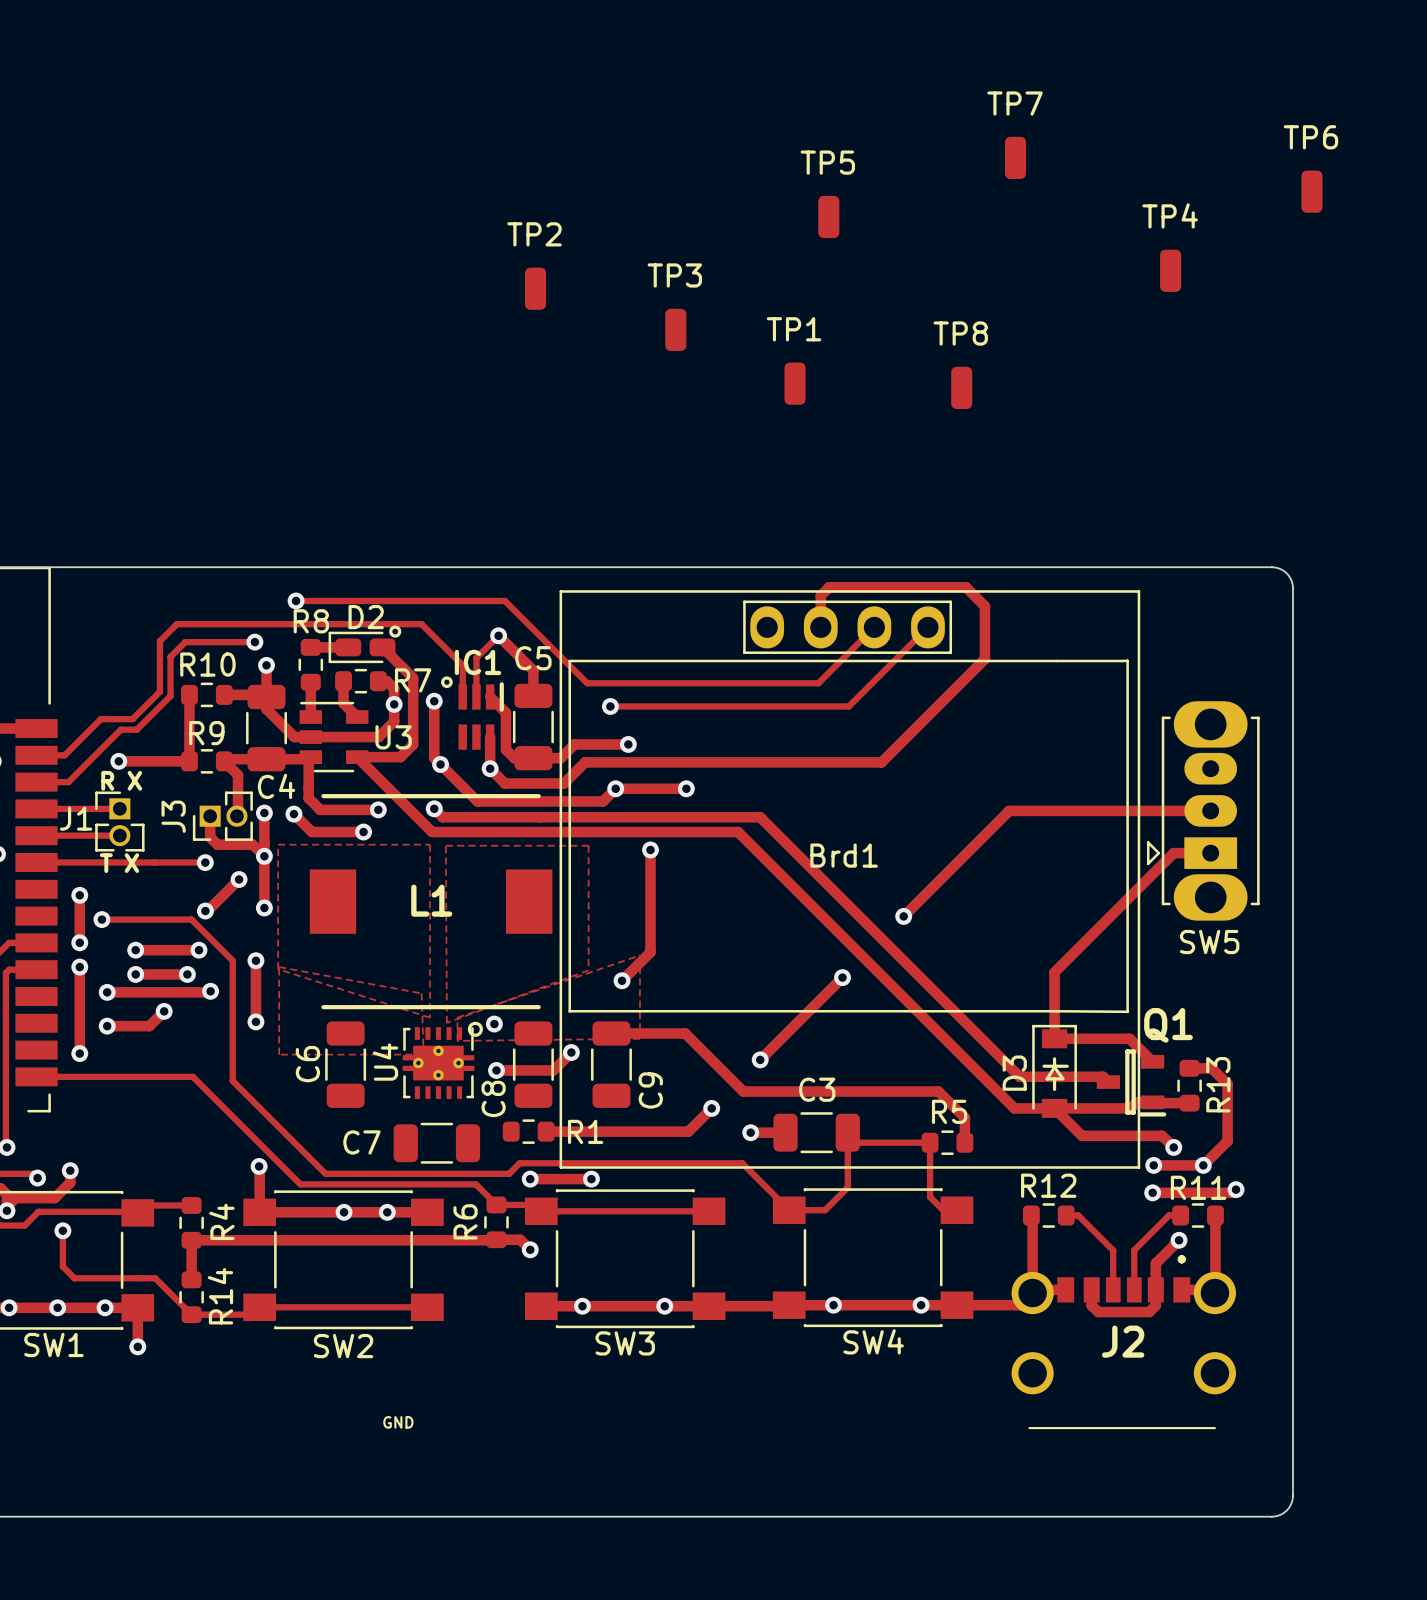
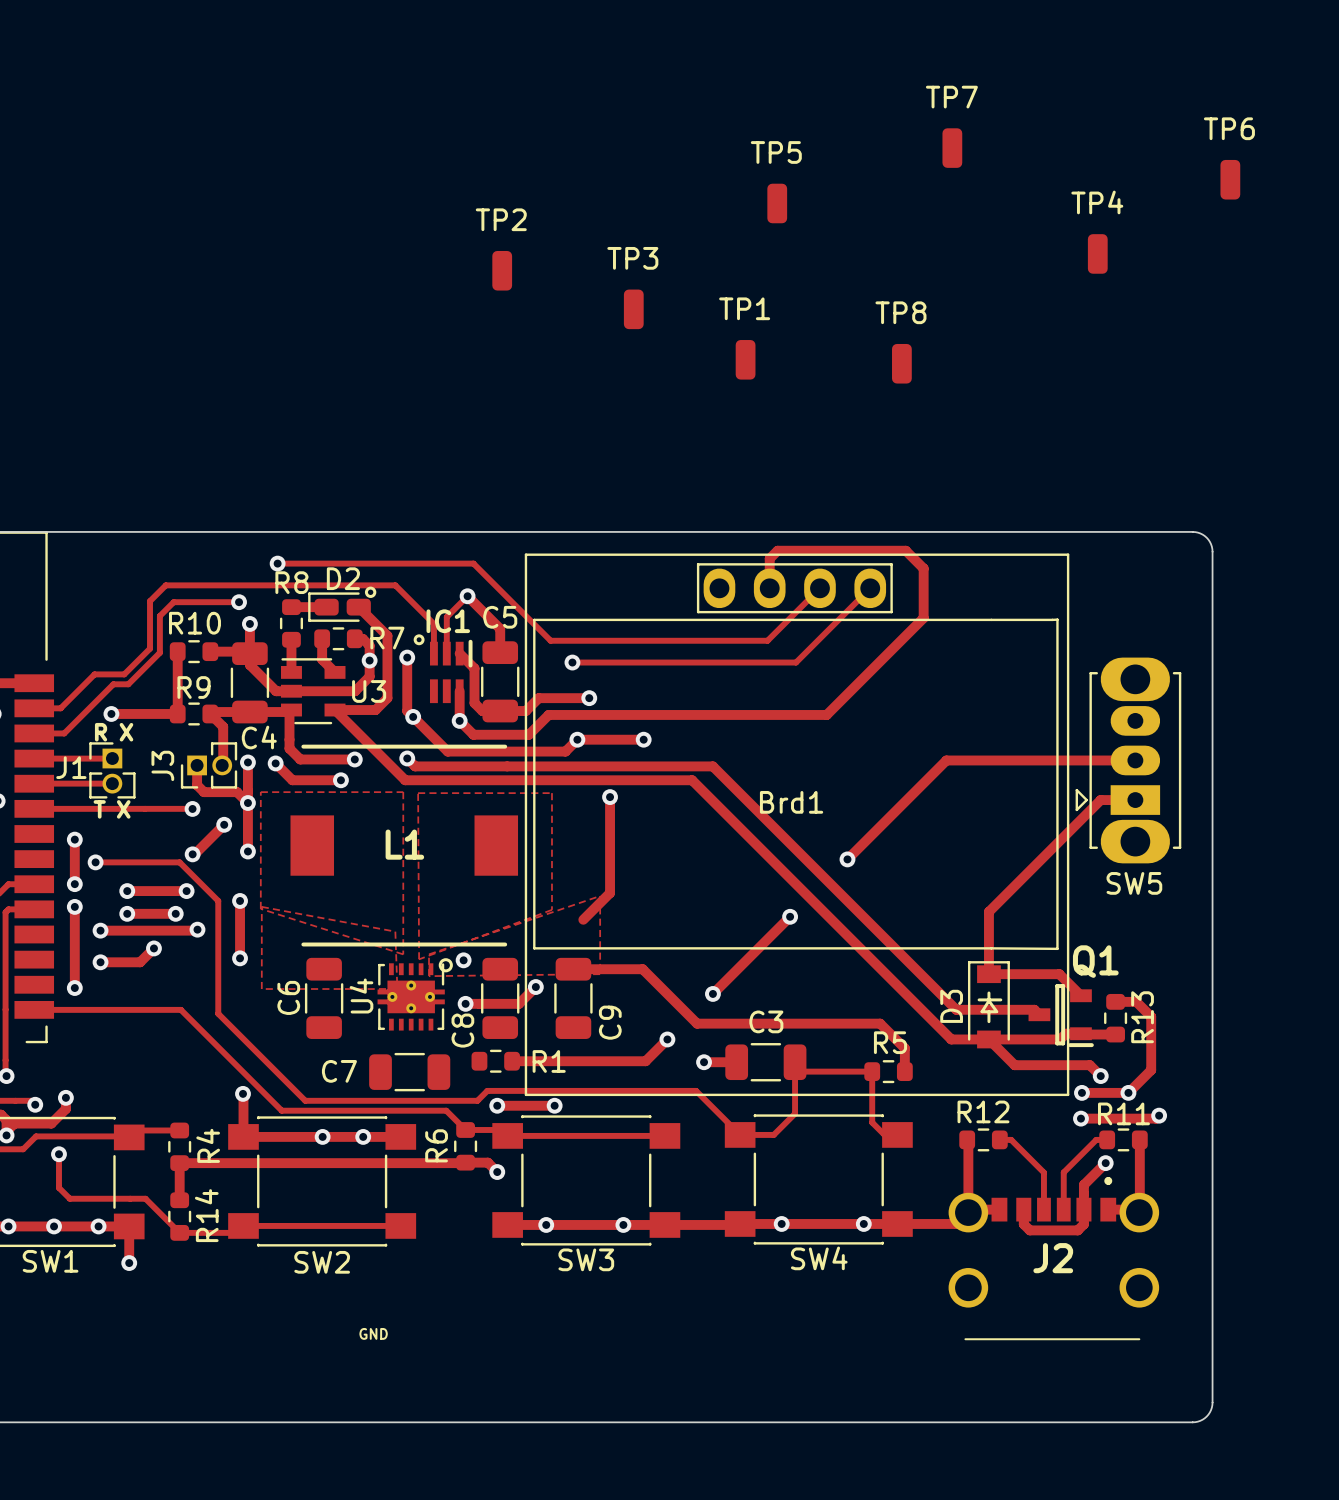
via: (622, 980) -> none

